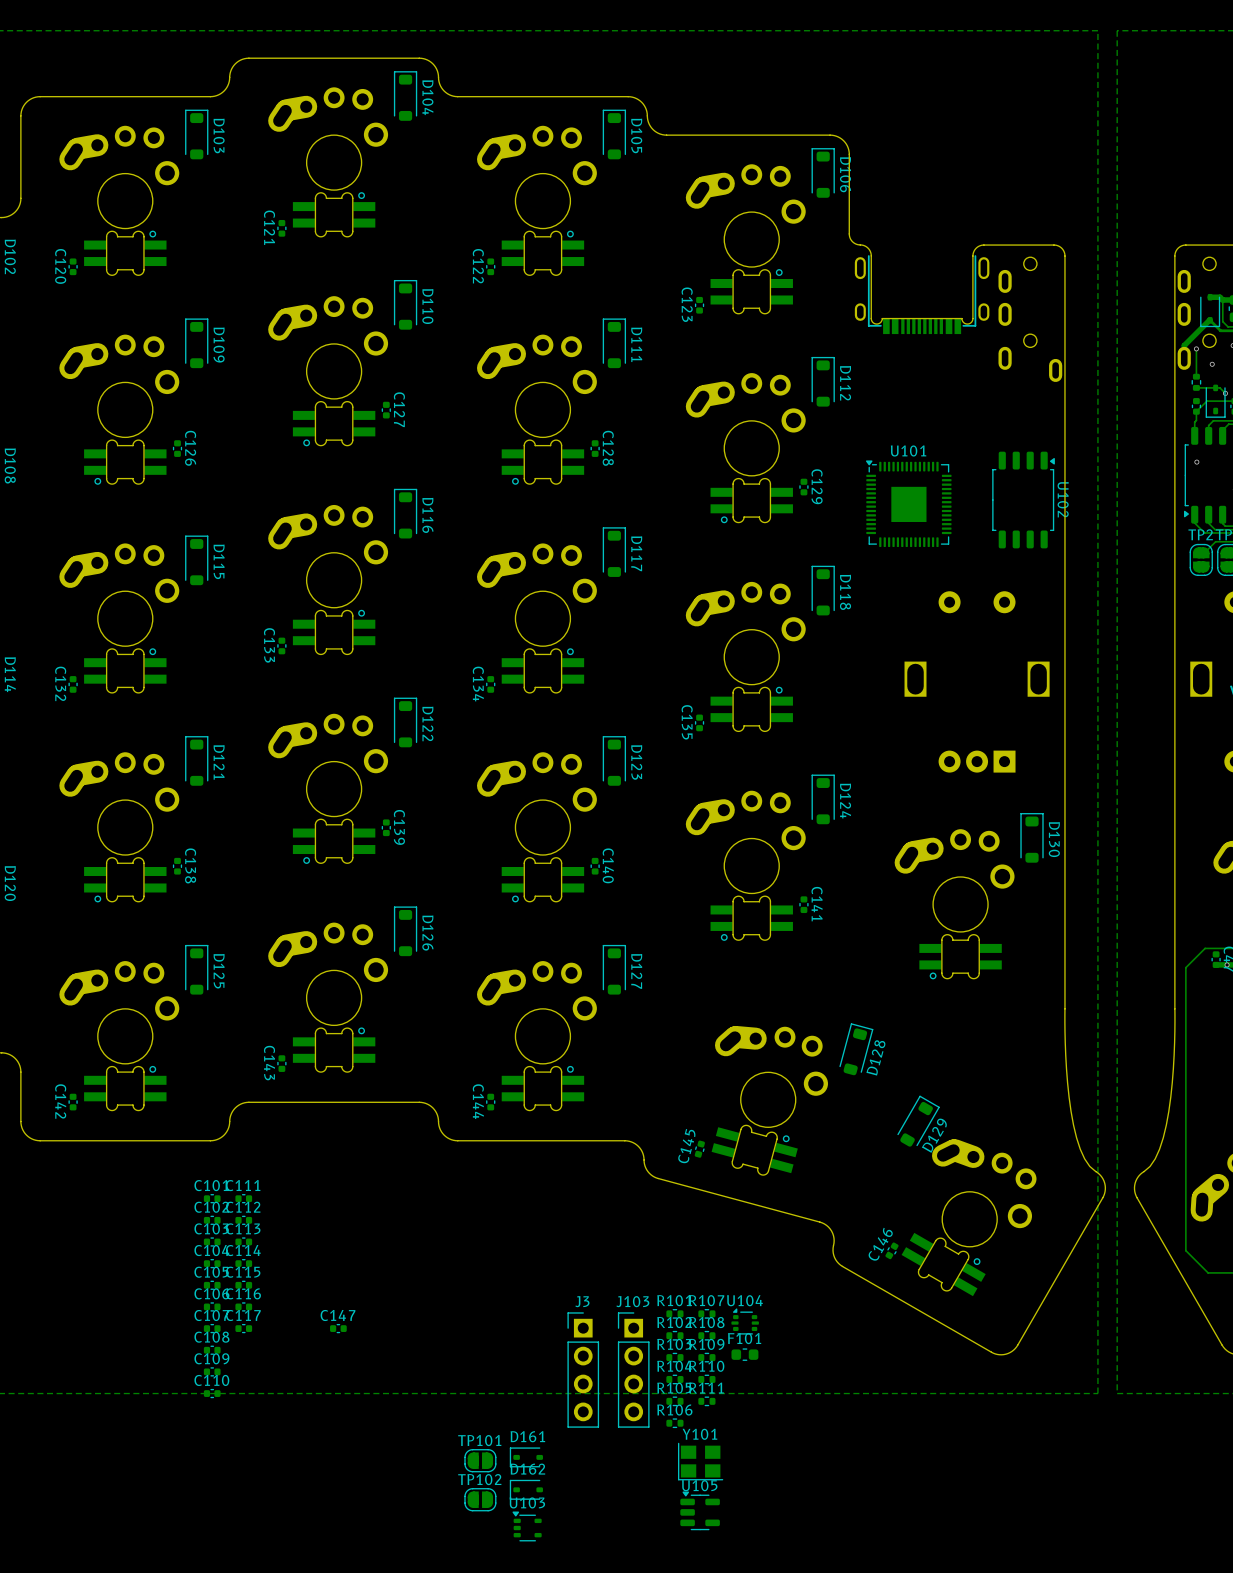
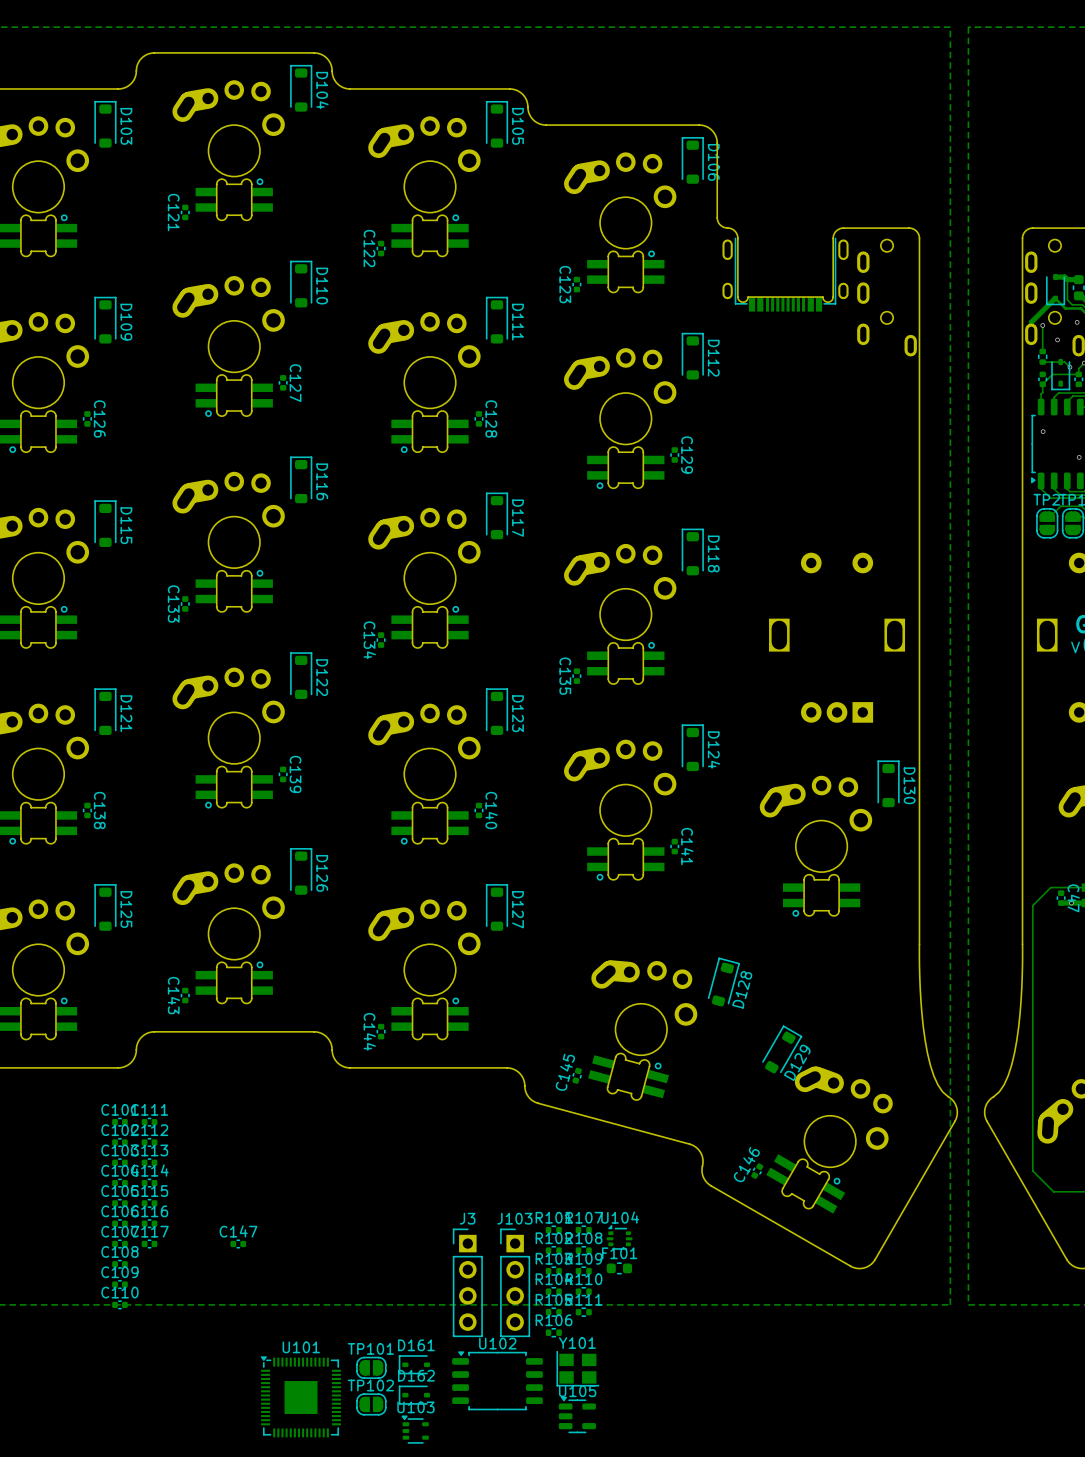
U102 rotation: 0° (1023, 500) -> 90° counterclockwise (497, 1380)
U102 position: (1023, 500) -> (497, 1380)
U101 position: (908, 503) -> (300, 1396)

